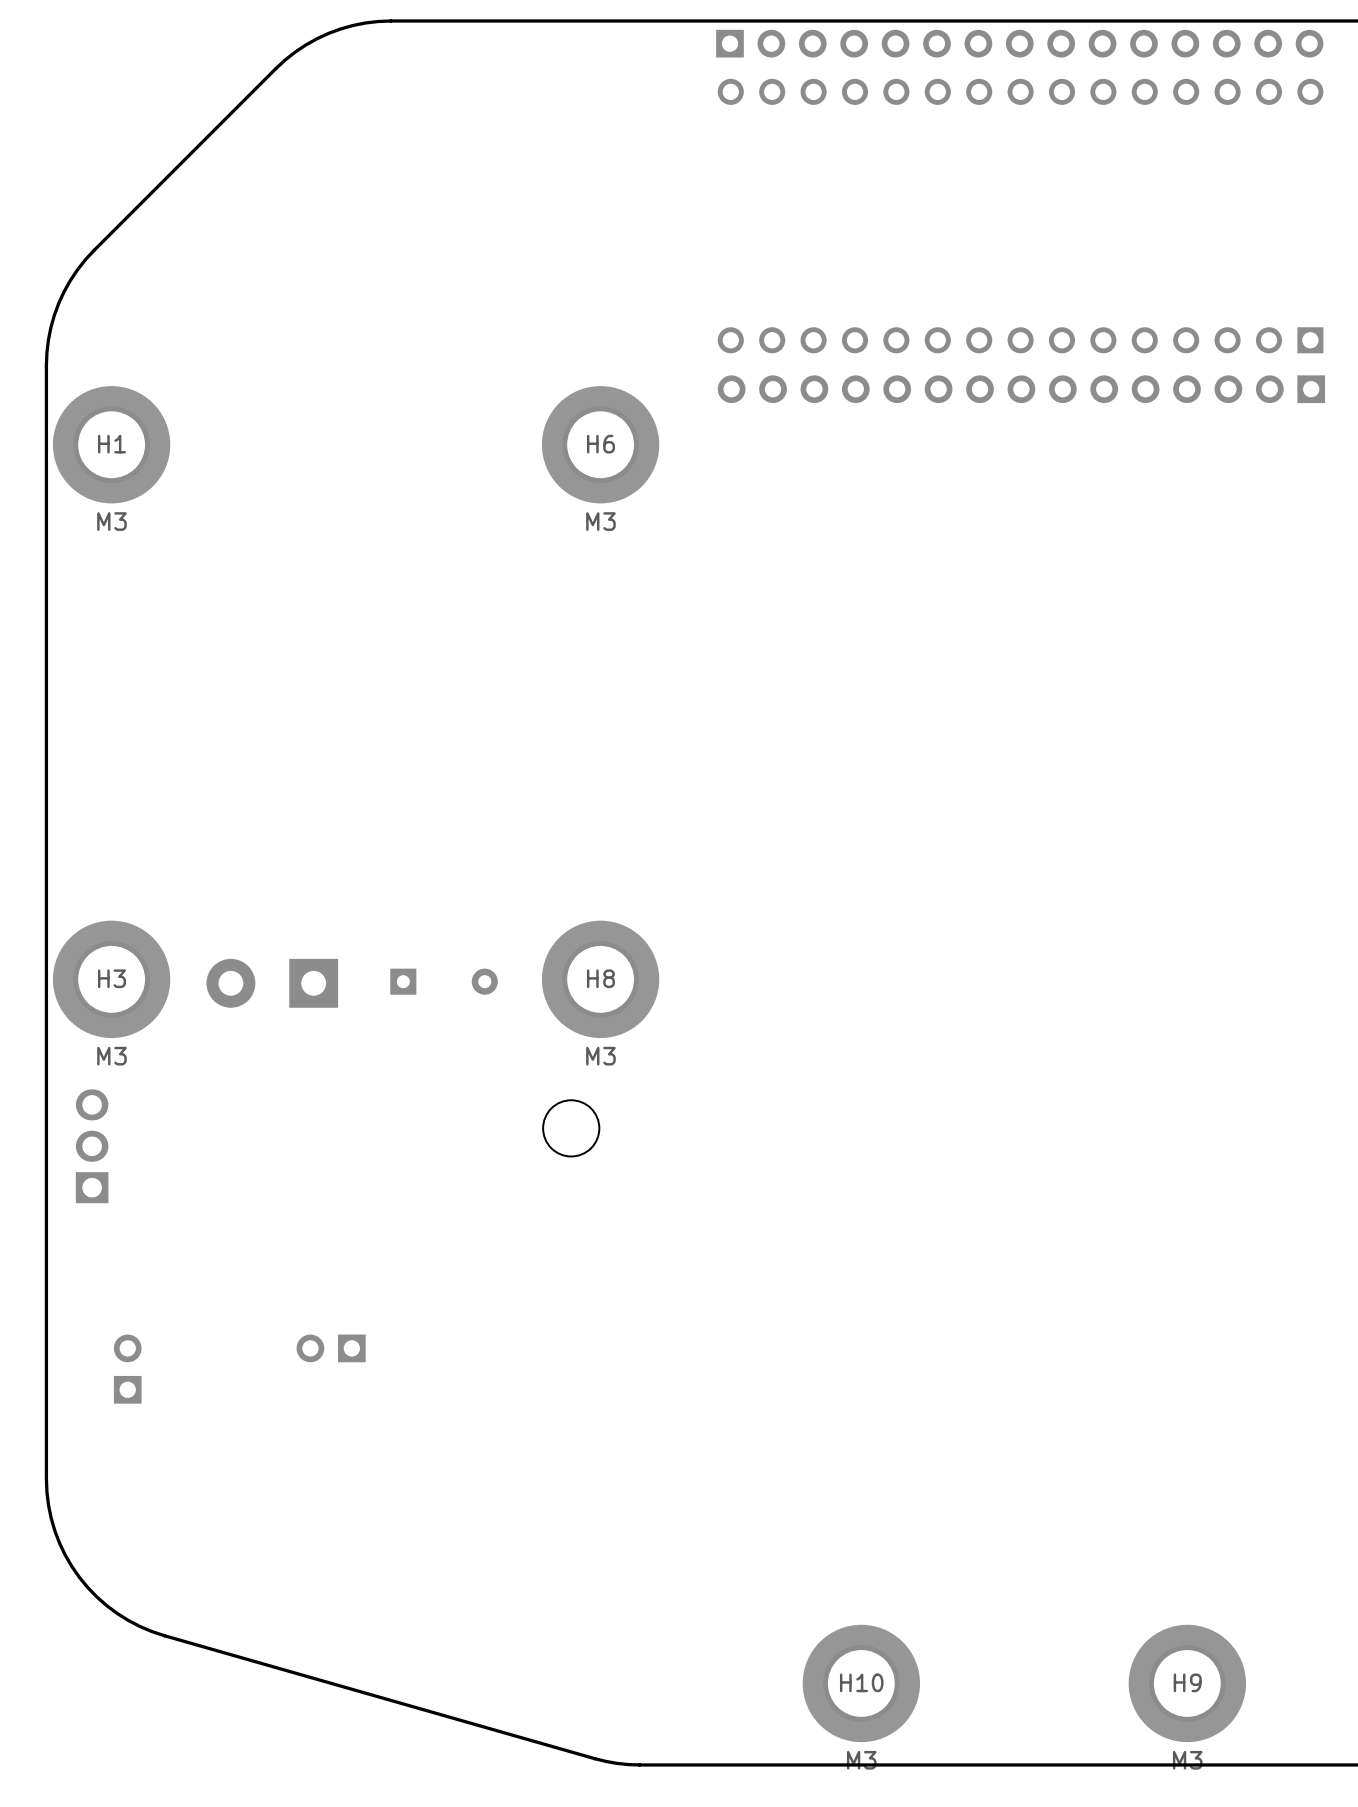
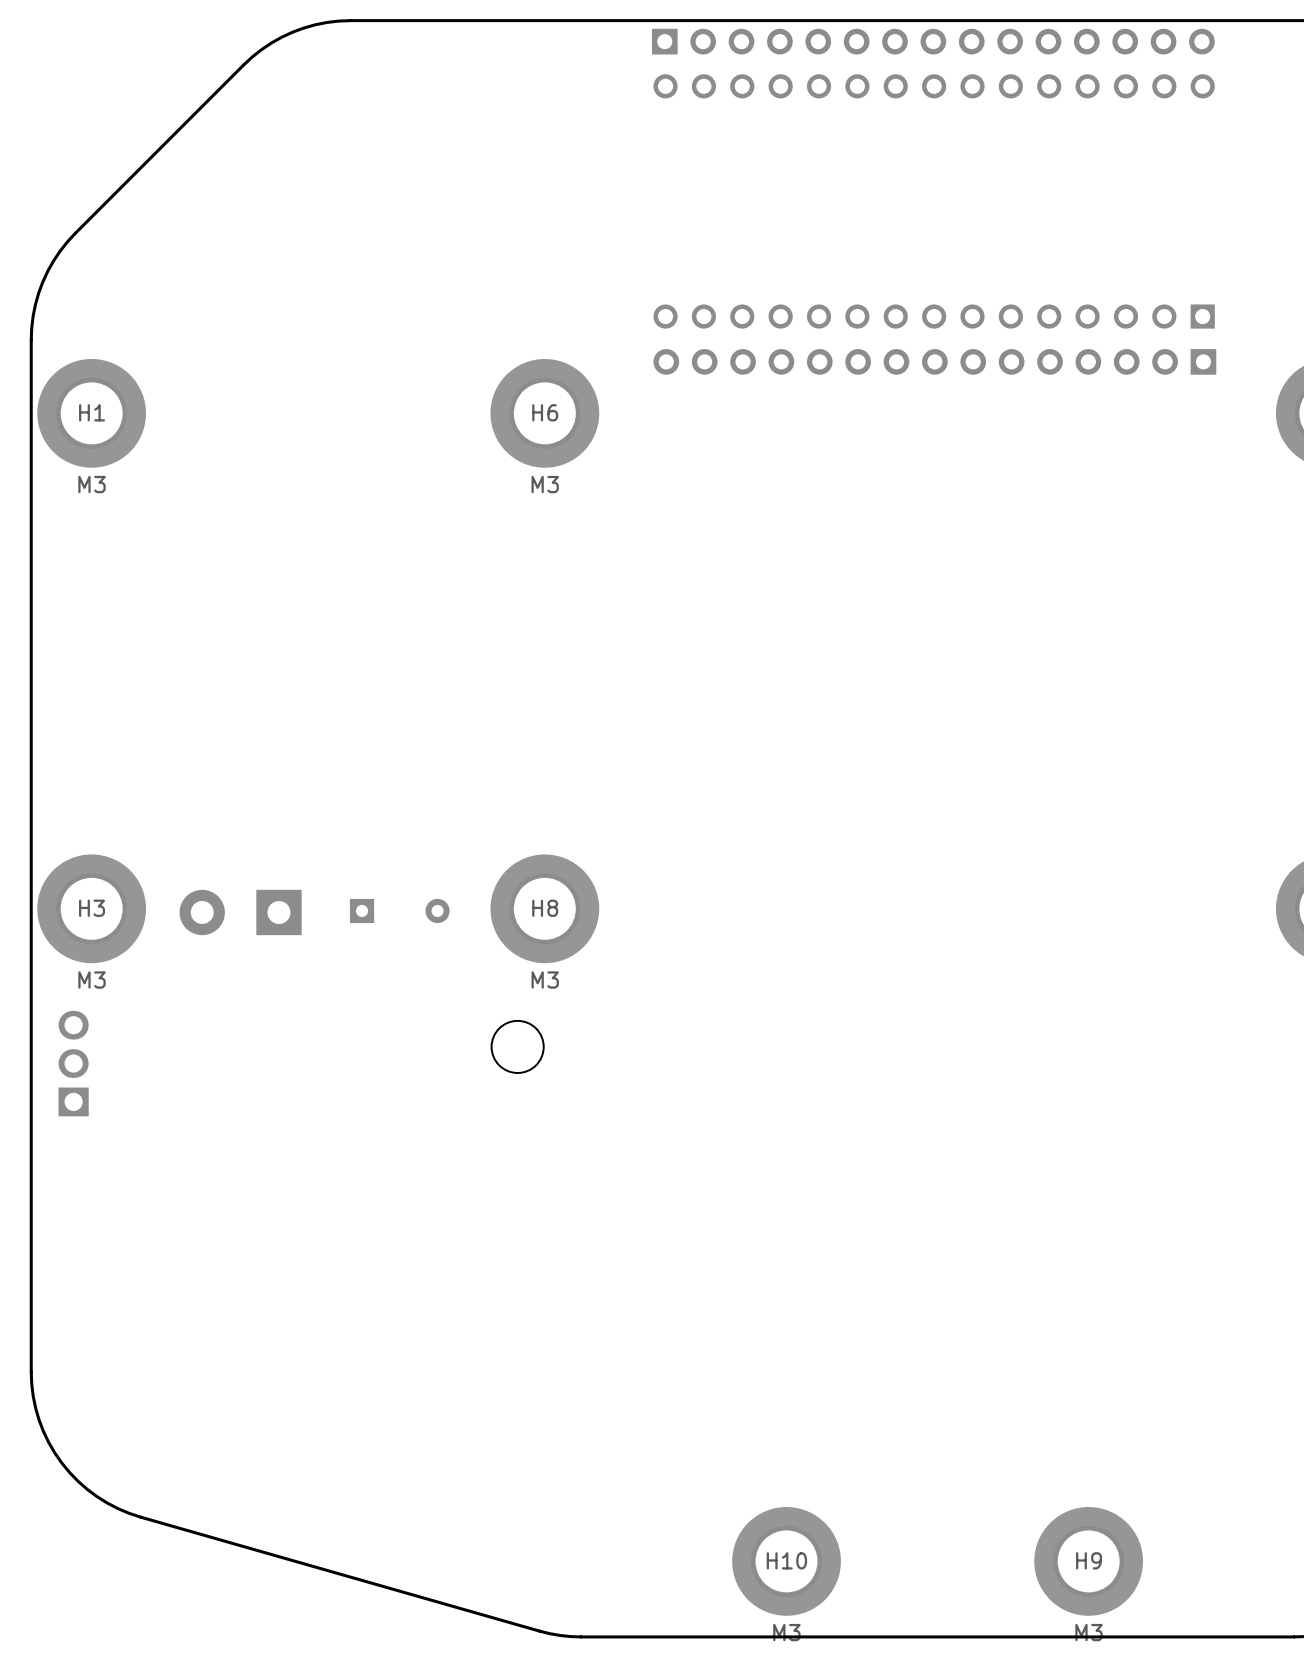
part: (331, 1348) -> none
part: (127, 1369) -> none

